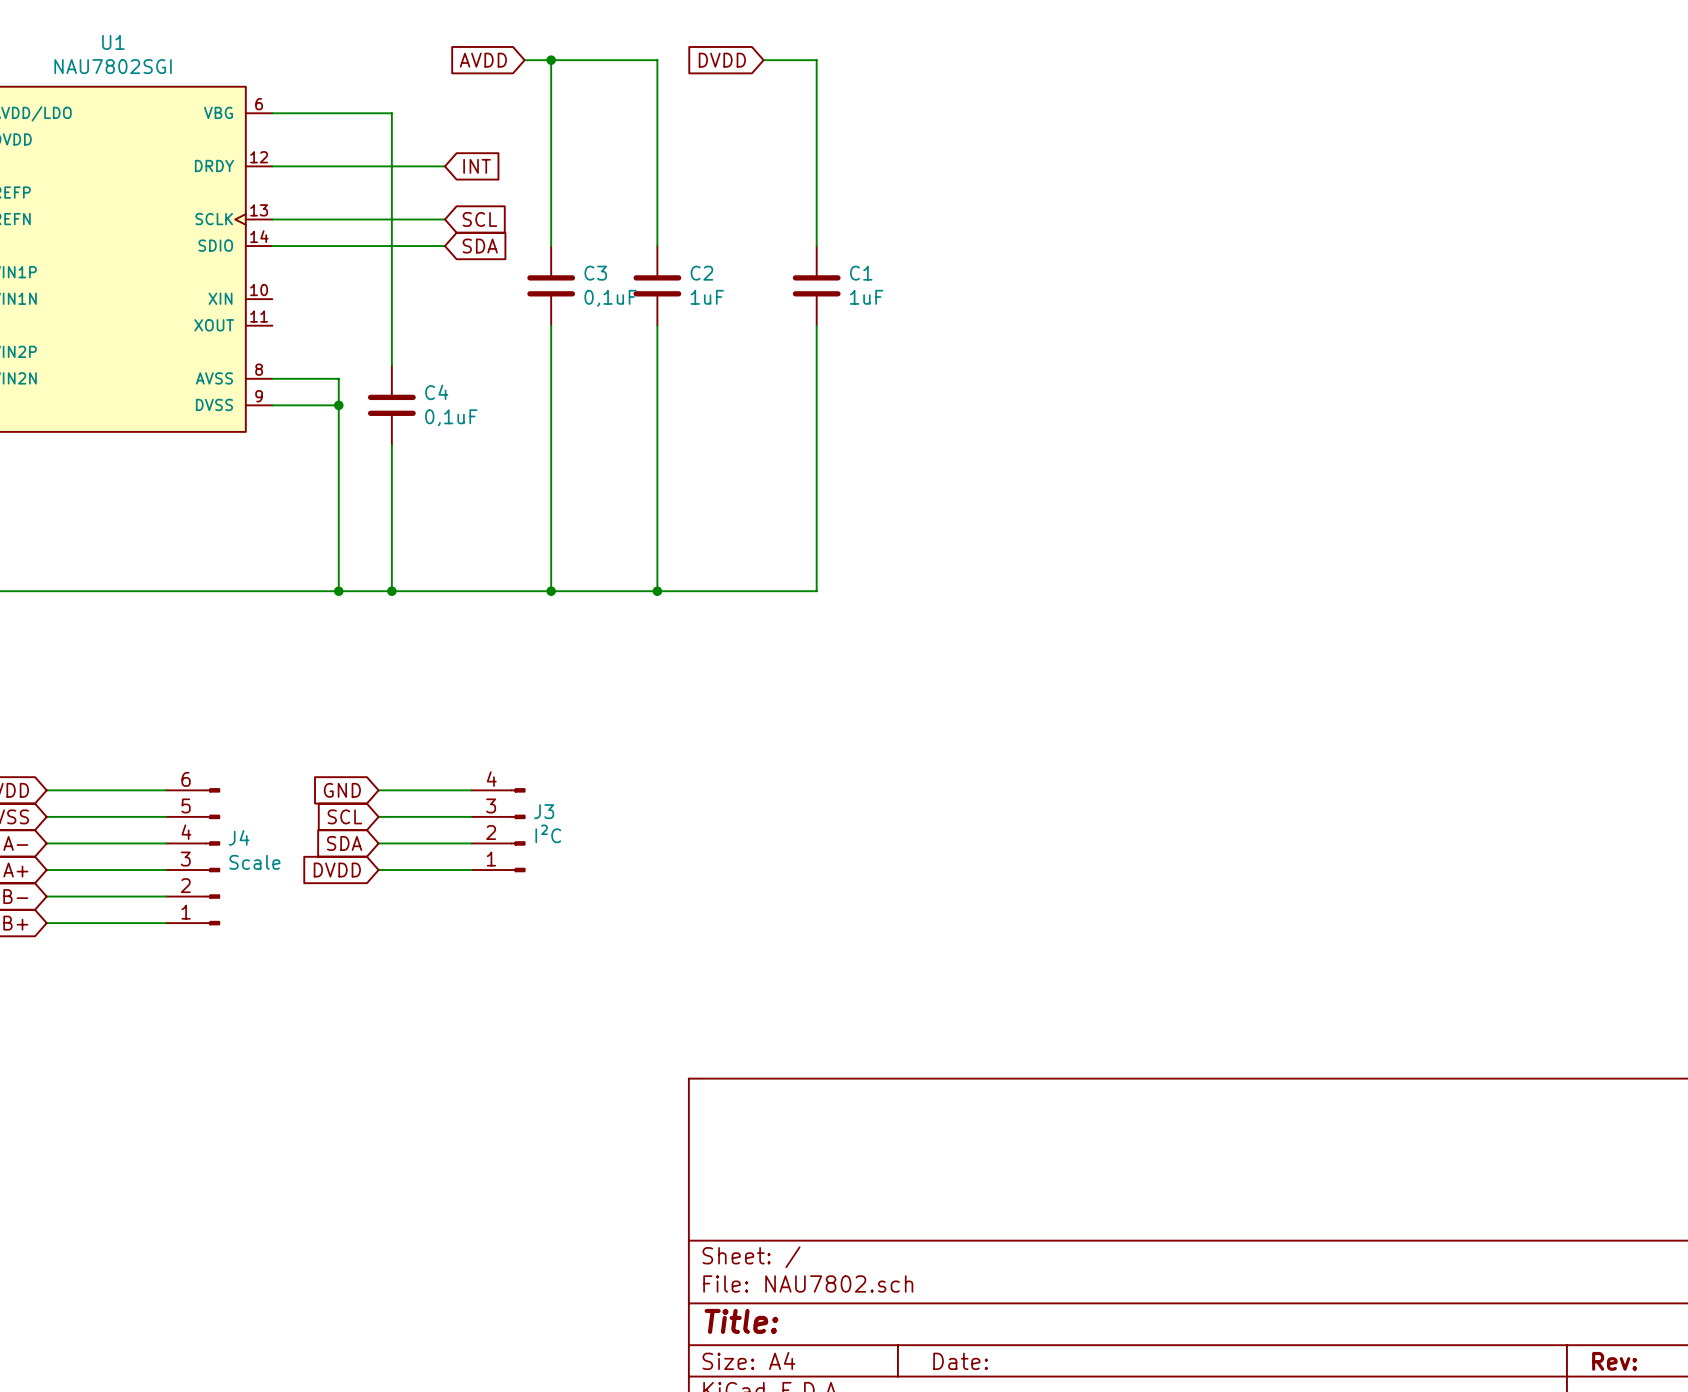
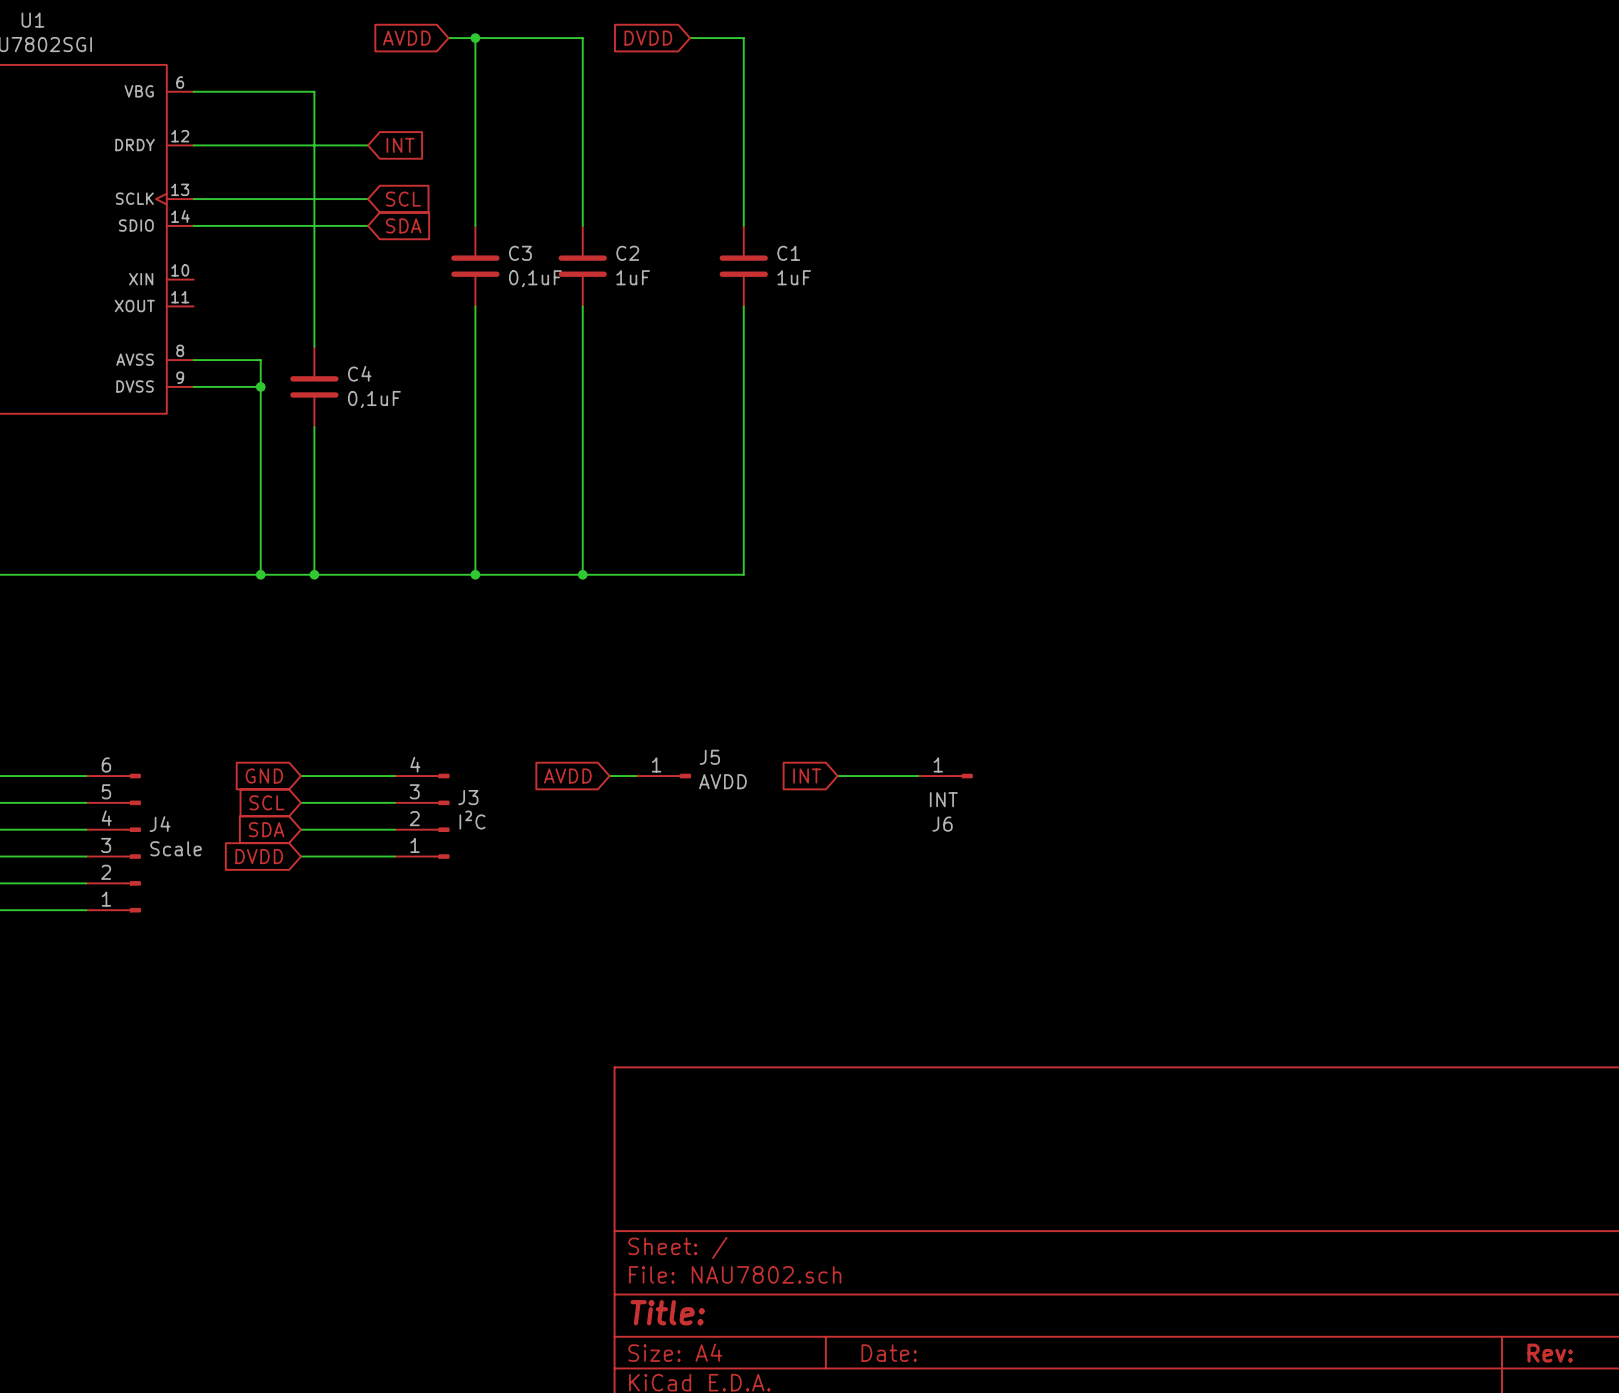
global label: none -> AVDD (567, 776)
wire: none -> (609, 776) (636, 776)
J5: none -> AVDD (663, 776)
global label: none -> INT (807, 776)
wire: none -> (837, 776) (918, 776)
J6: none -> INT (945, 776)

